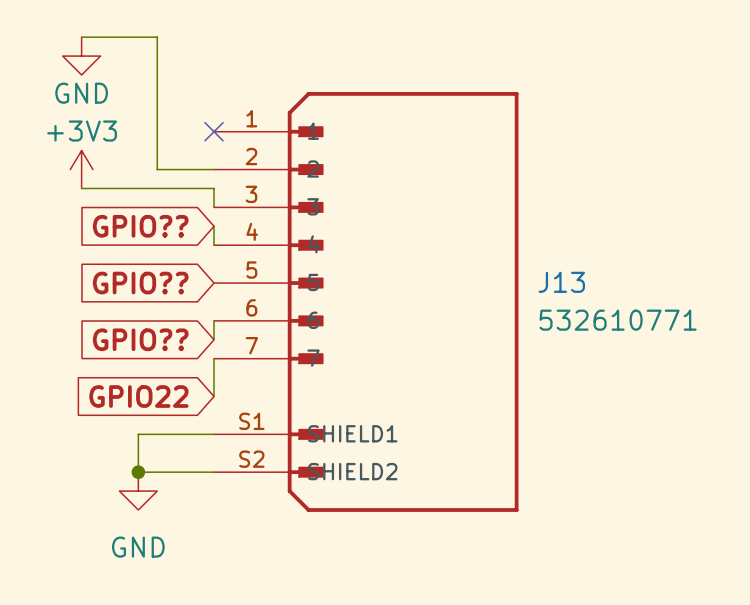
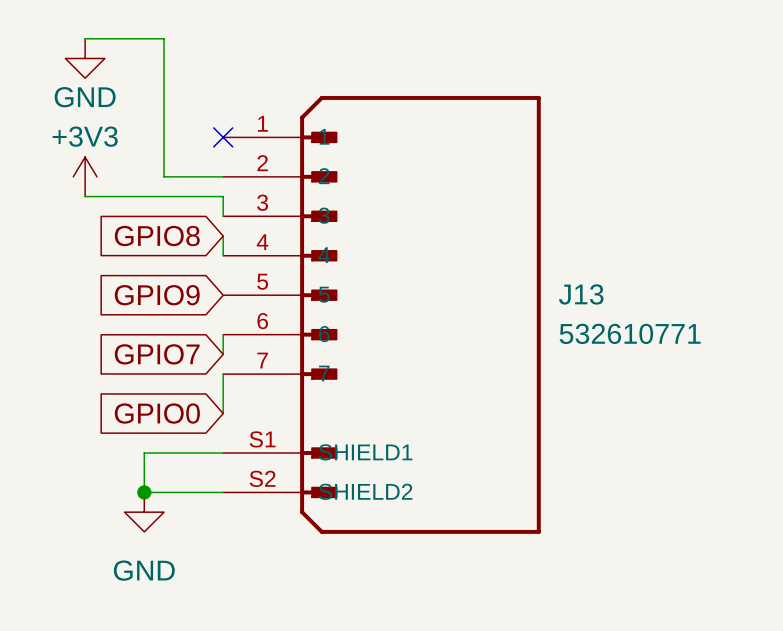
global label: GPIO?? (140, 226) -> GPIO8 (157, 236)
global label: GPIO?? (140, 283) -> GPIO9 (157, 295)
global label: GPIO?? (140, 339) -> GPIO7 (157, 354)
global label: GPIO22 (138, 396) -> GPIO0 (157, 413)

